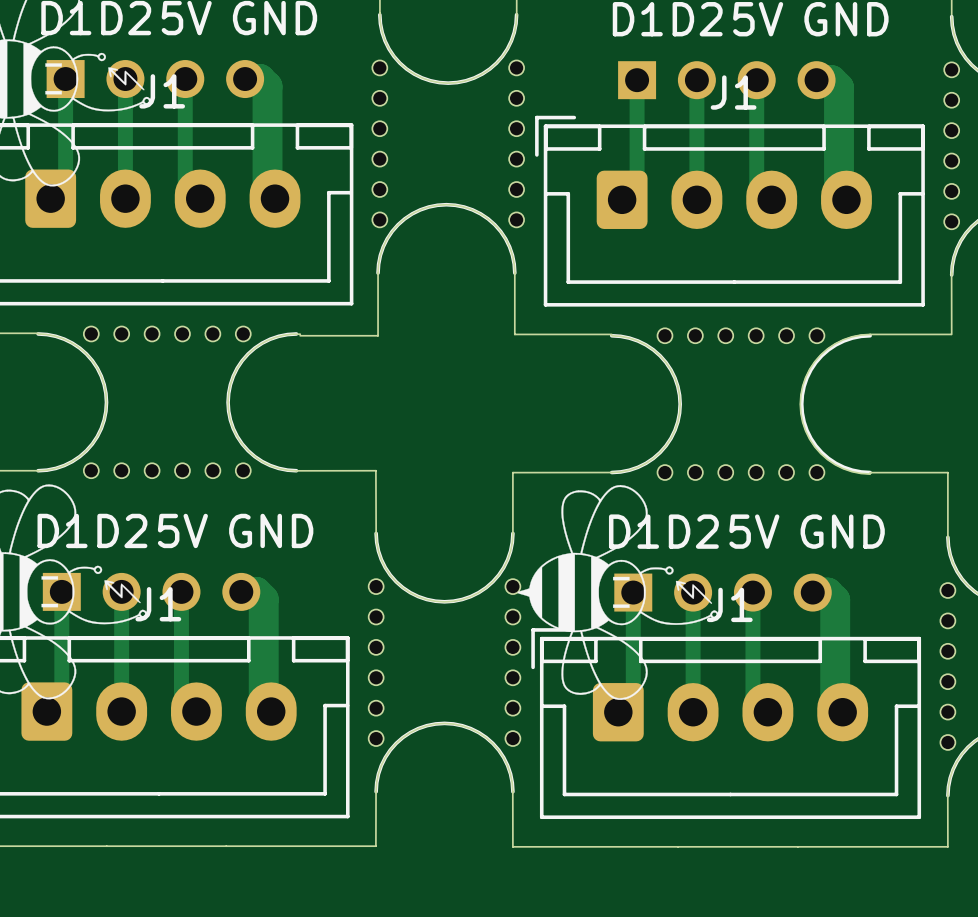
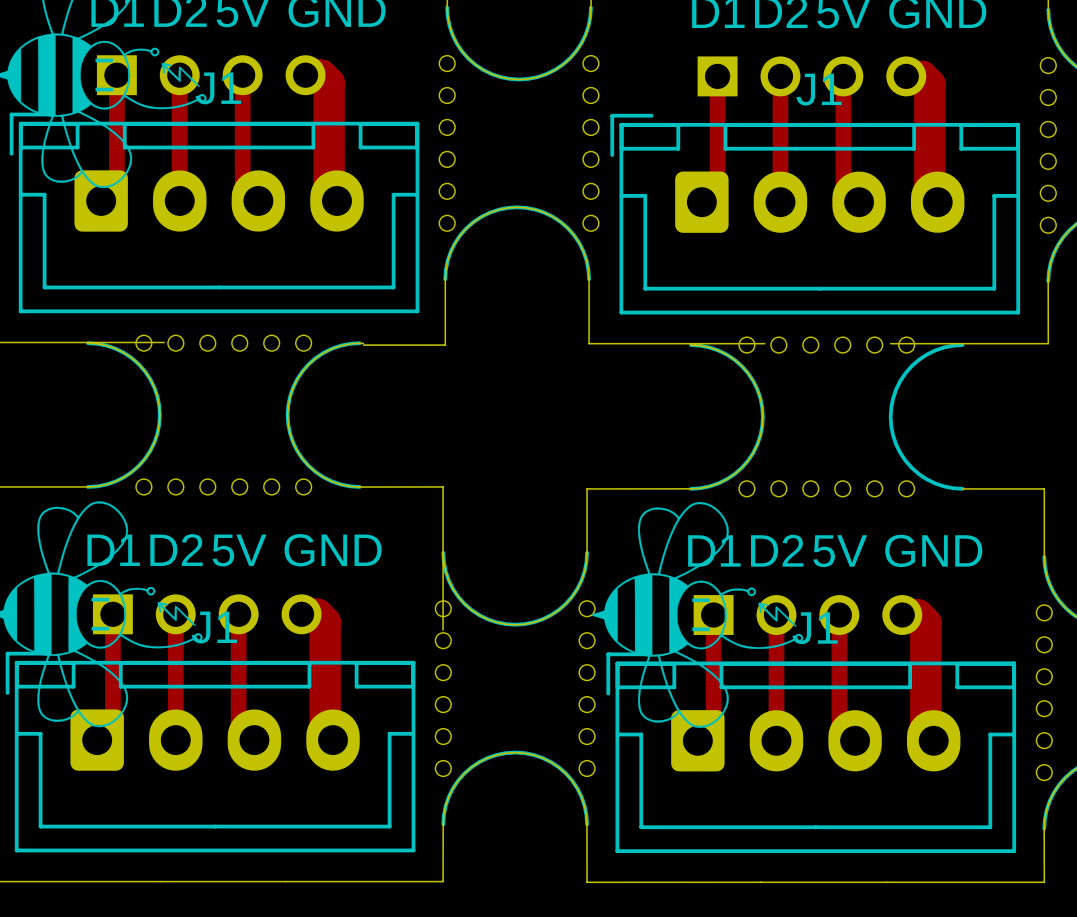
board edge: none -> (87, 342) (164, 342)
board edge: none -> (691, 343) (764, 343)
board edge: (870, 334) (843, 339) (820, 354) (805, 377) (800, 404) (805, 430) (820, 453) (843, 468) (870, 474) -> (962, 343) (890, 343)
board edge: (375, 470) (376, 533) -> (443, 486) (443, 630)

